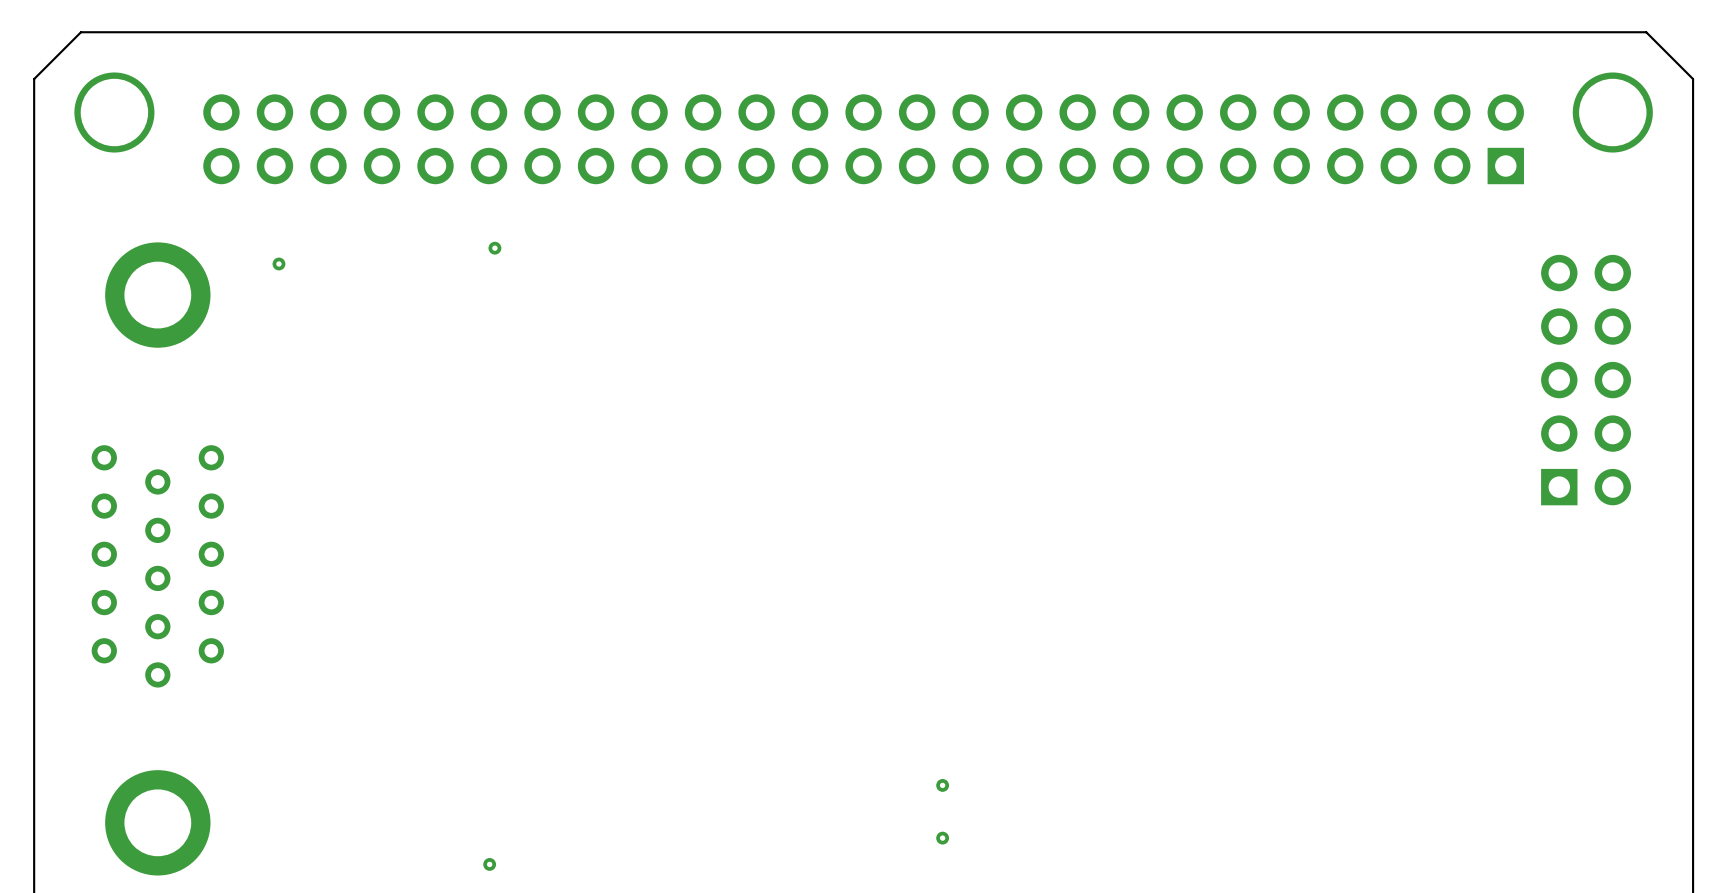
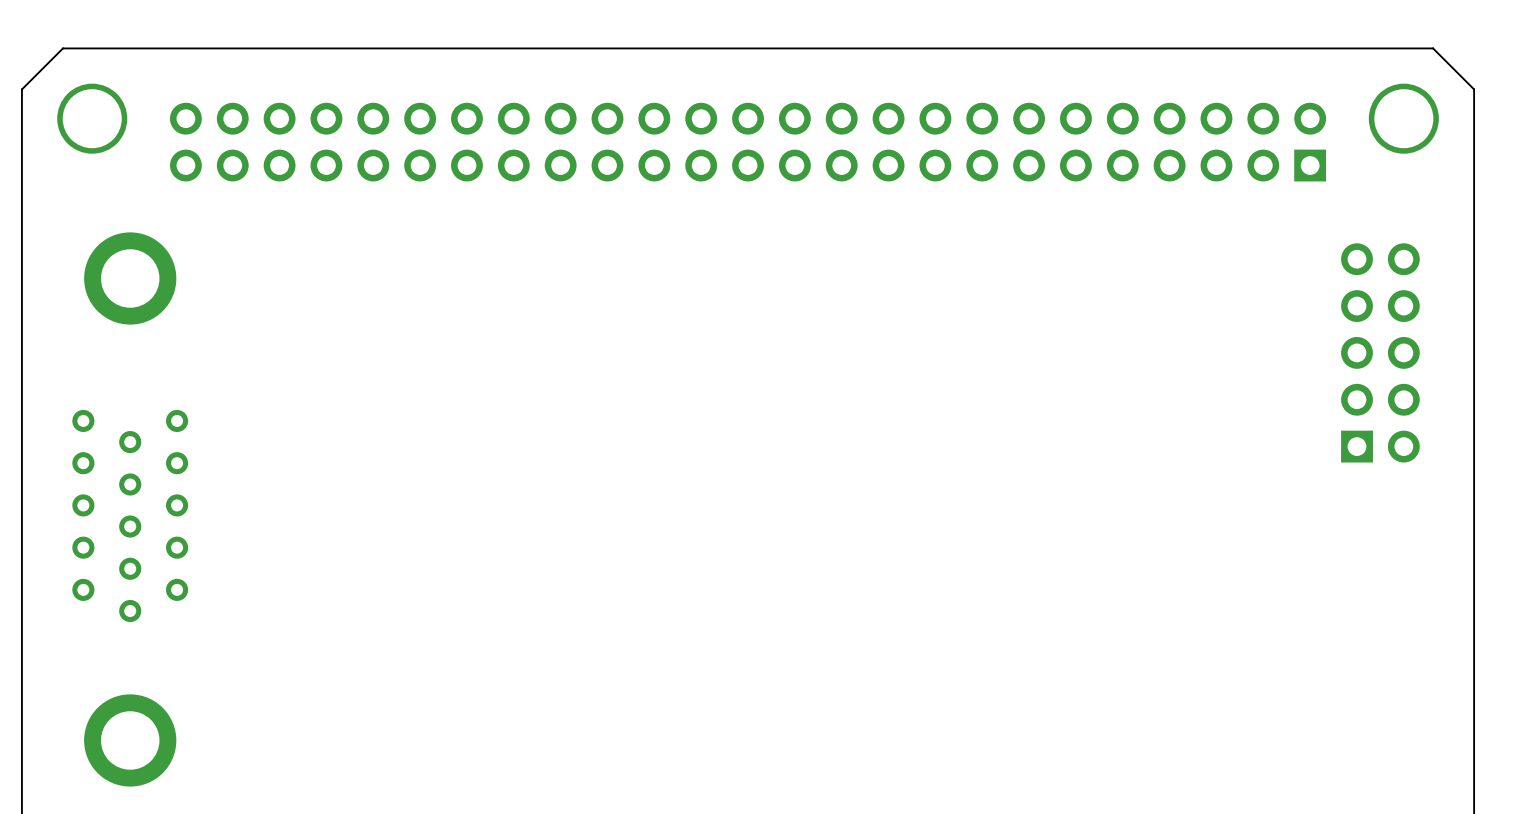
via: (494, 248) -> none
via: (278, 263) -> none
via: (942, 785) -> none
via: (942, 838) -> none
via: (489, 864) -> none

